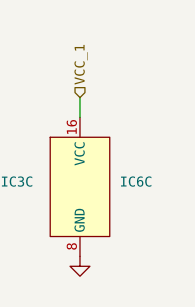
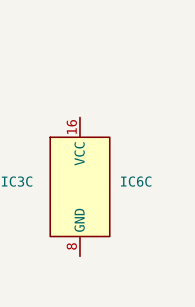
hierarchical label: VCC_1 (81, 64) -> none
wire: (79, 97) (79, 117) -> none
power symbol: (79, 266) -> none

